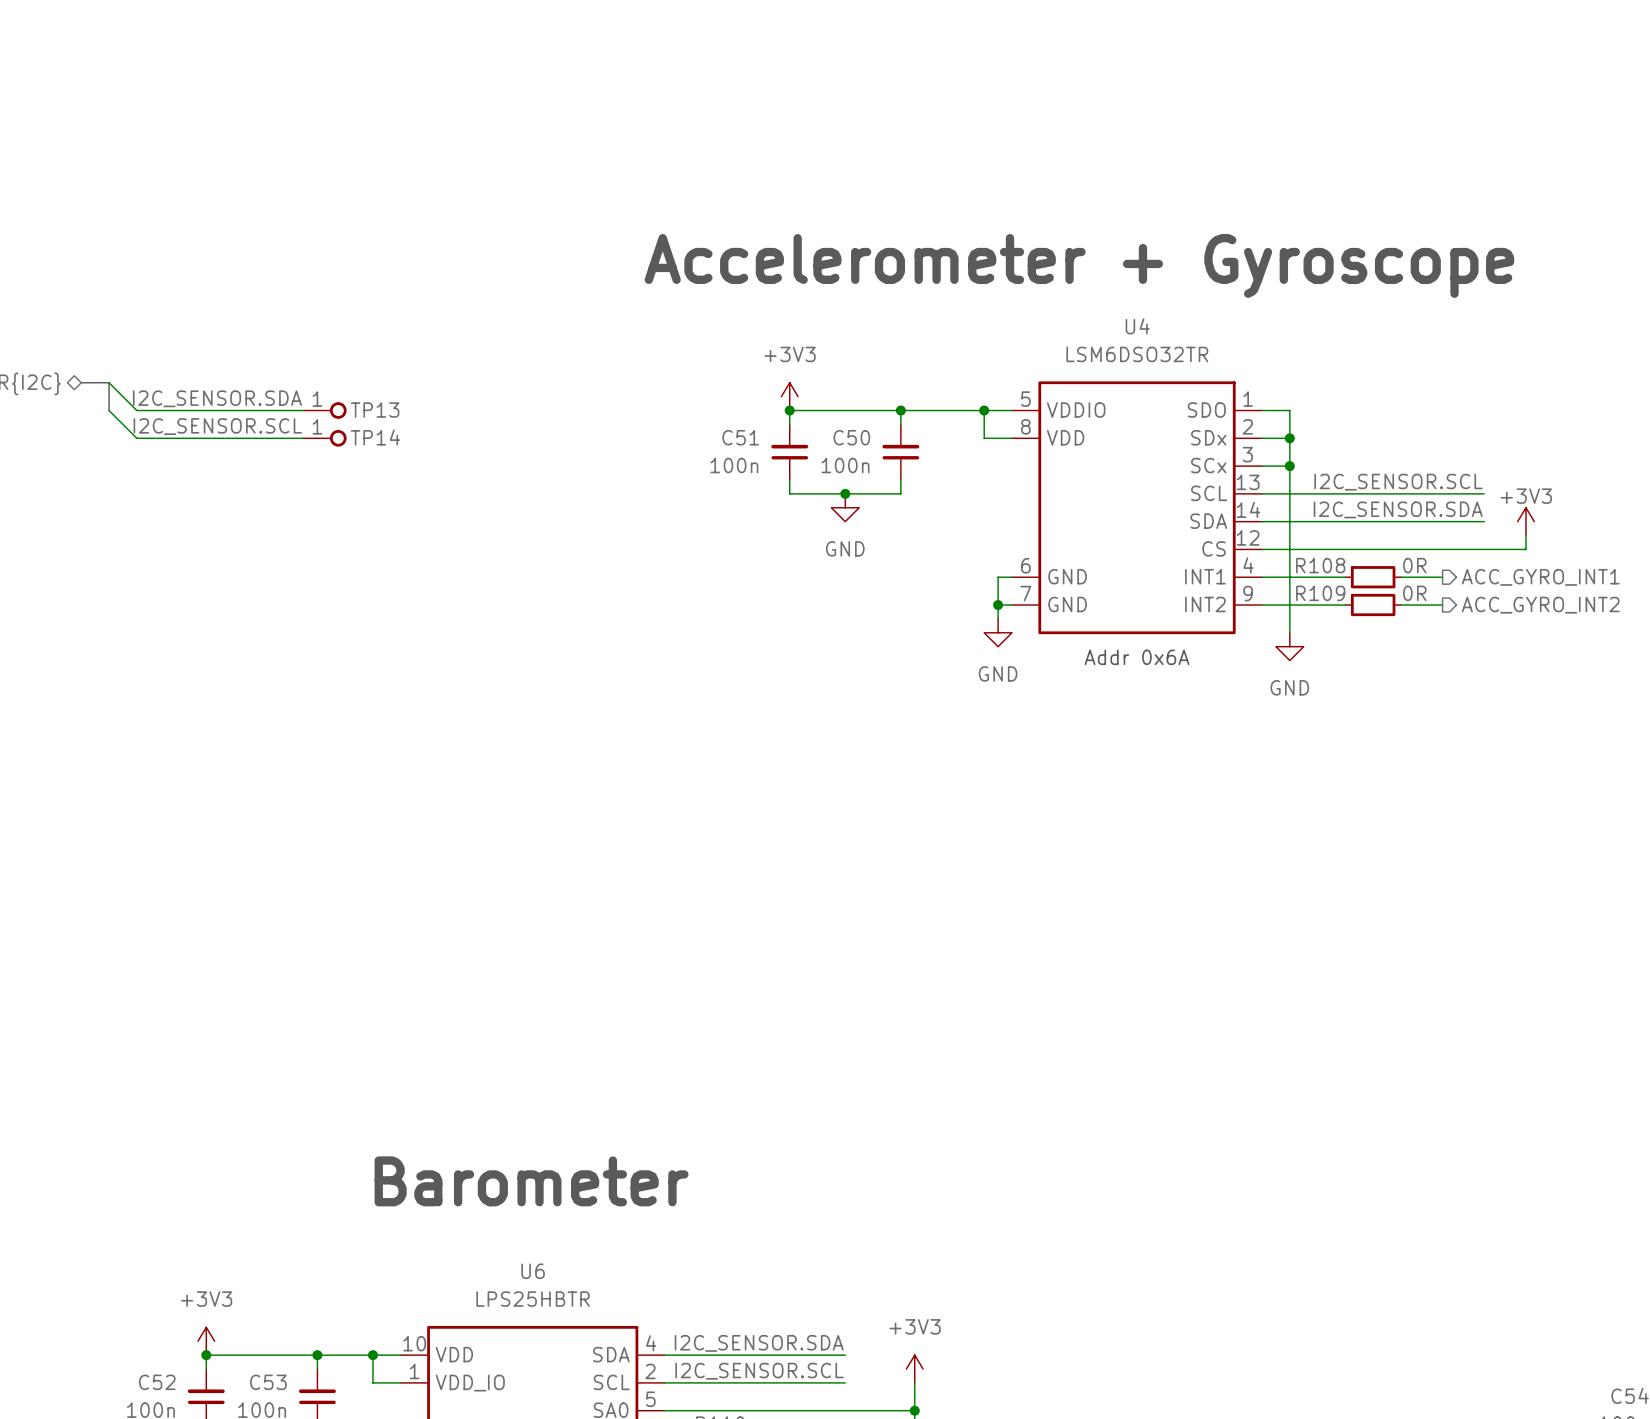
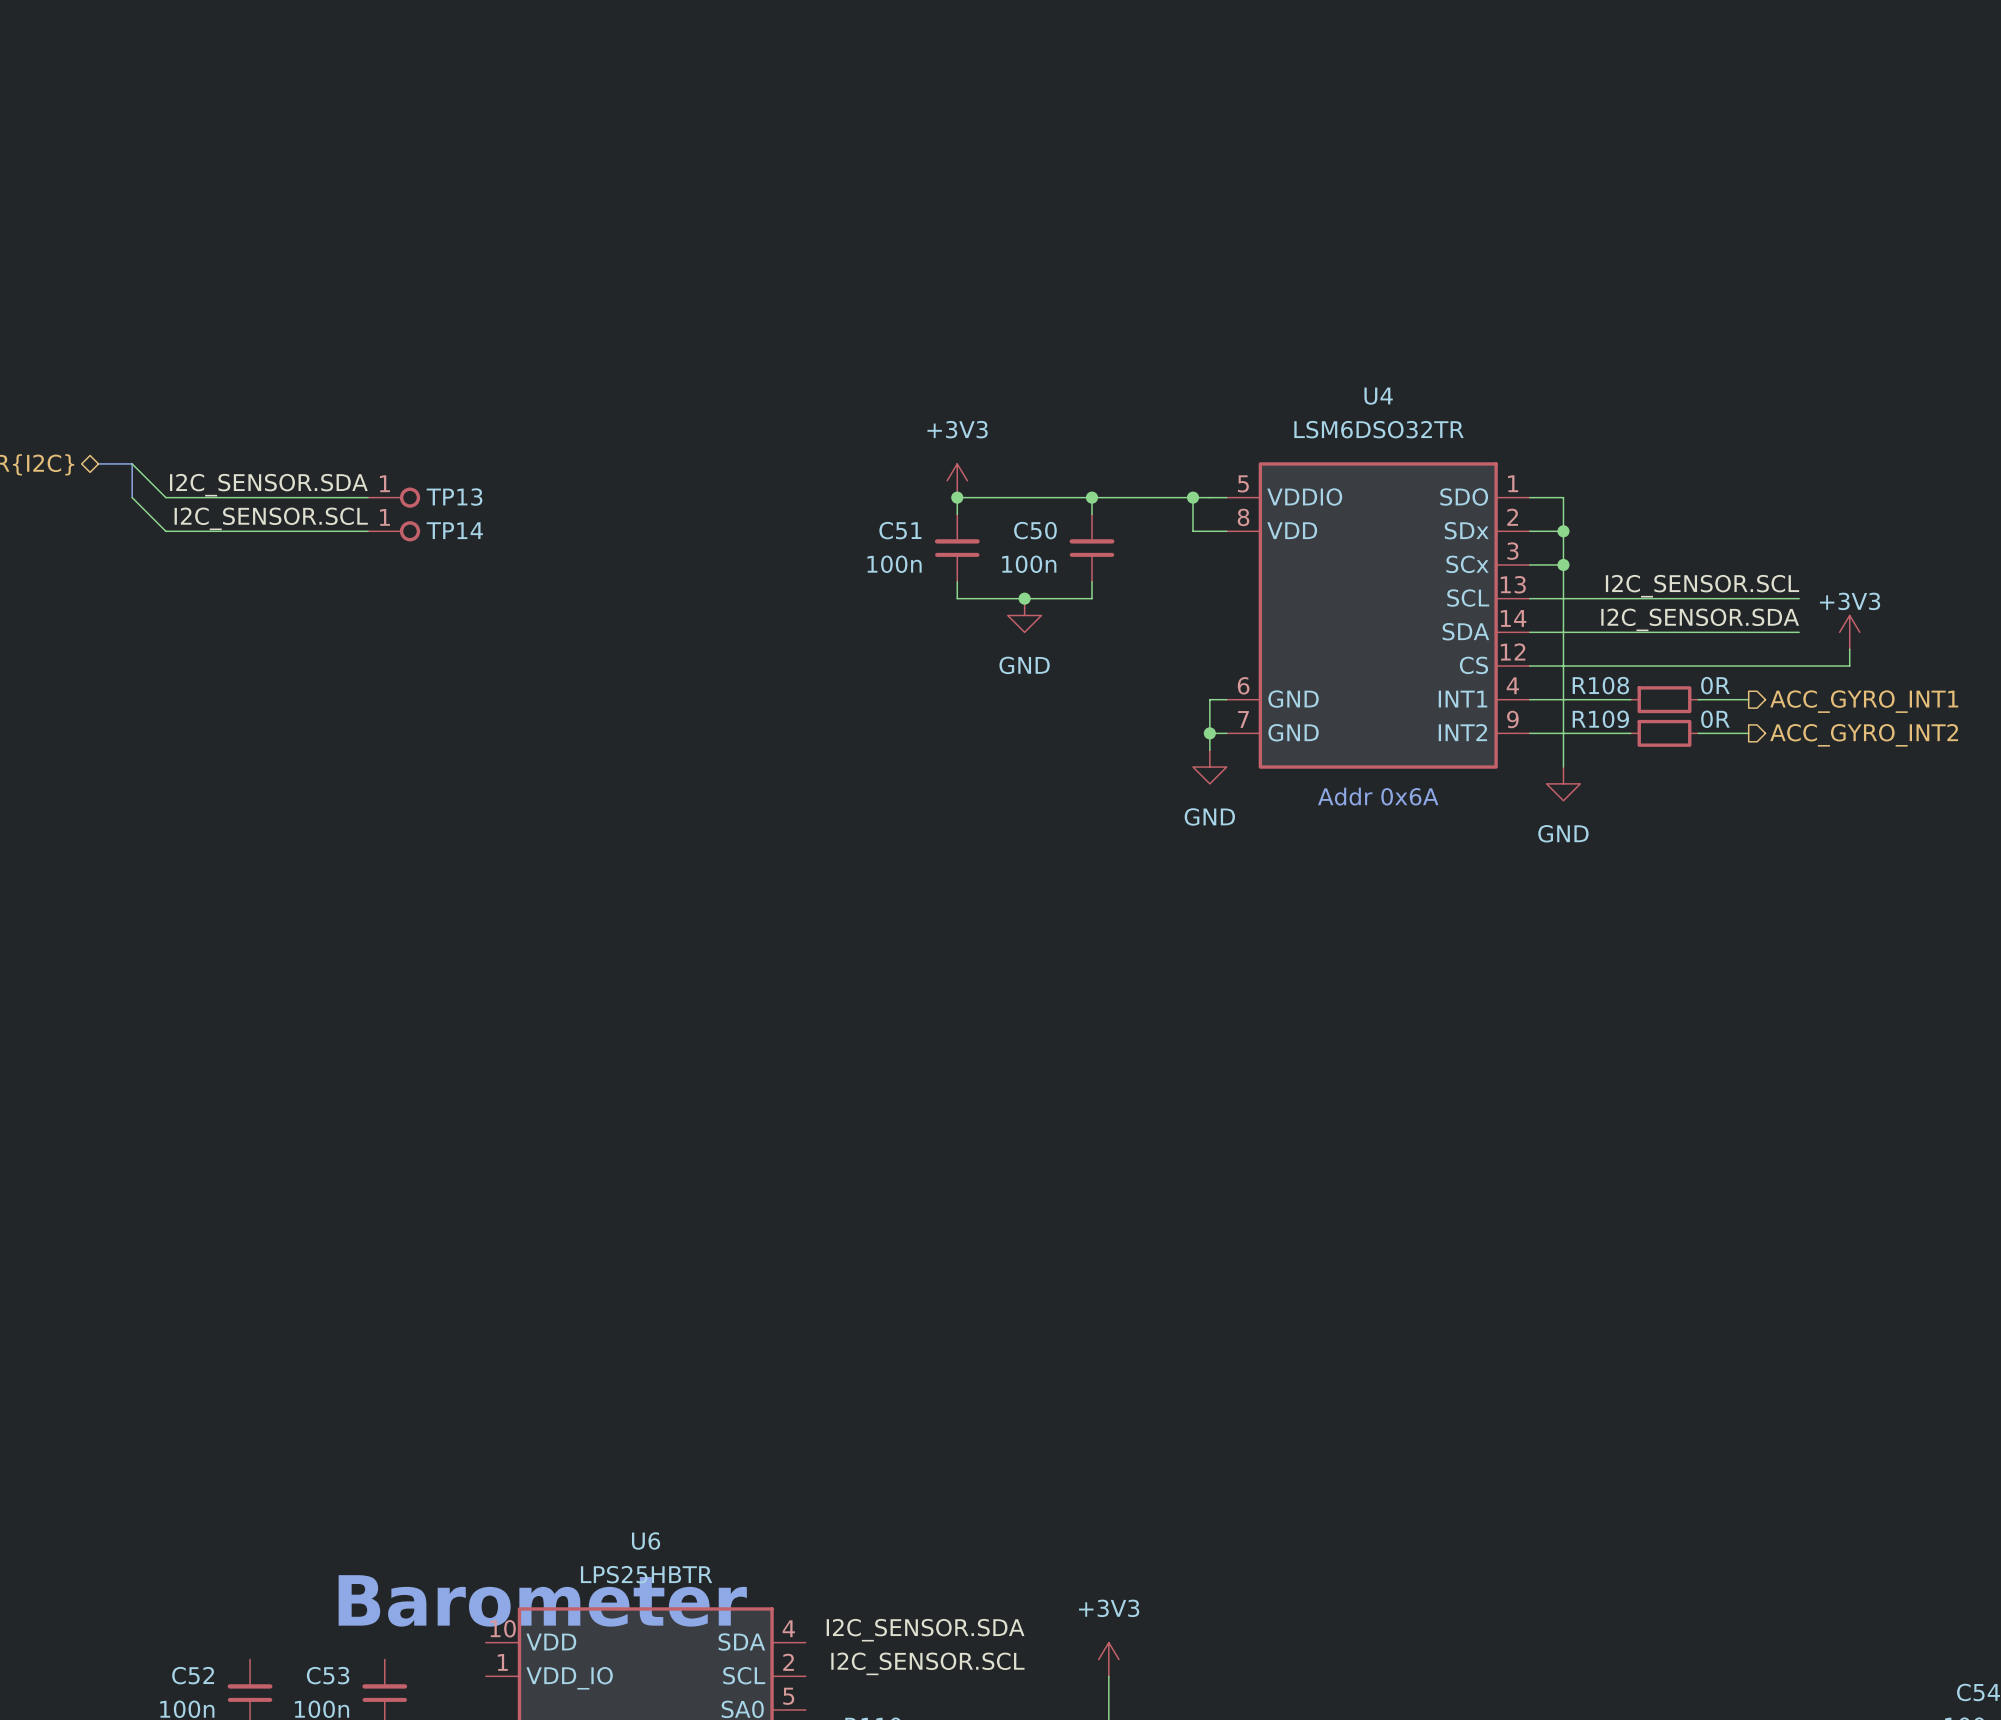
text: Accelerometer + Gyroscope (1079, 265) -> none
text position: Barometer (531, 1181) -> Barometer (542, 1600)
power symbol: +3V3 (206, 1341) -> none
junction: (206, 1355) -> none
wire: (317, 1355) (317, 1369) -> none
junction: (317, 1355) -> none
wire: (372, 1355) (372, 1382) (400, 1382) -> none
junction: (372, 1355) -> none
wire: (400, 1355) (206, 1355) (206, 1369) -> none
wire: (664, 1355) (845, 1355) -> none
wire: (664, 1382) (845, 1382) -> none
wire: (664, 1410) (914, 1410) -> none
junction: (914, 1410) -> none

